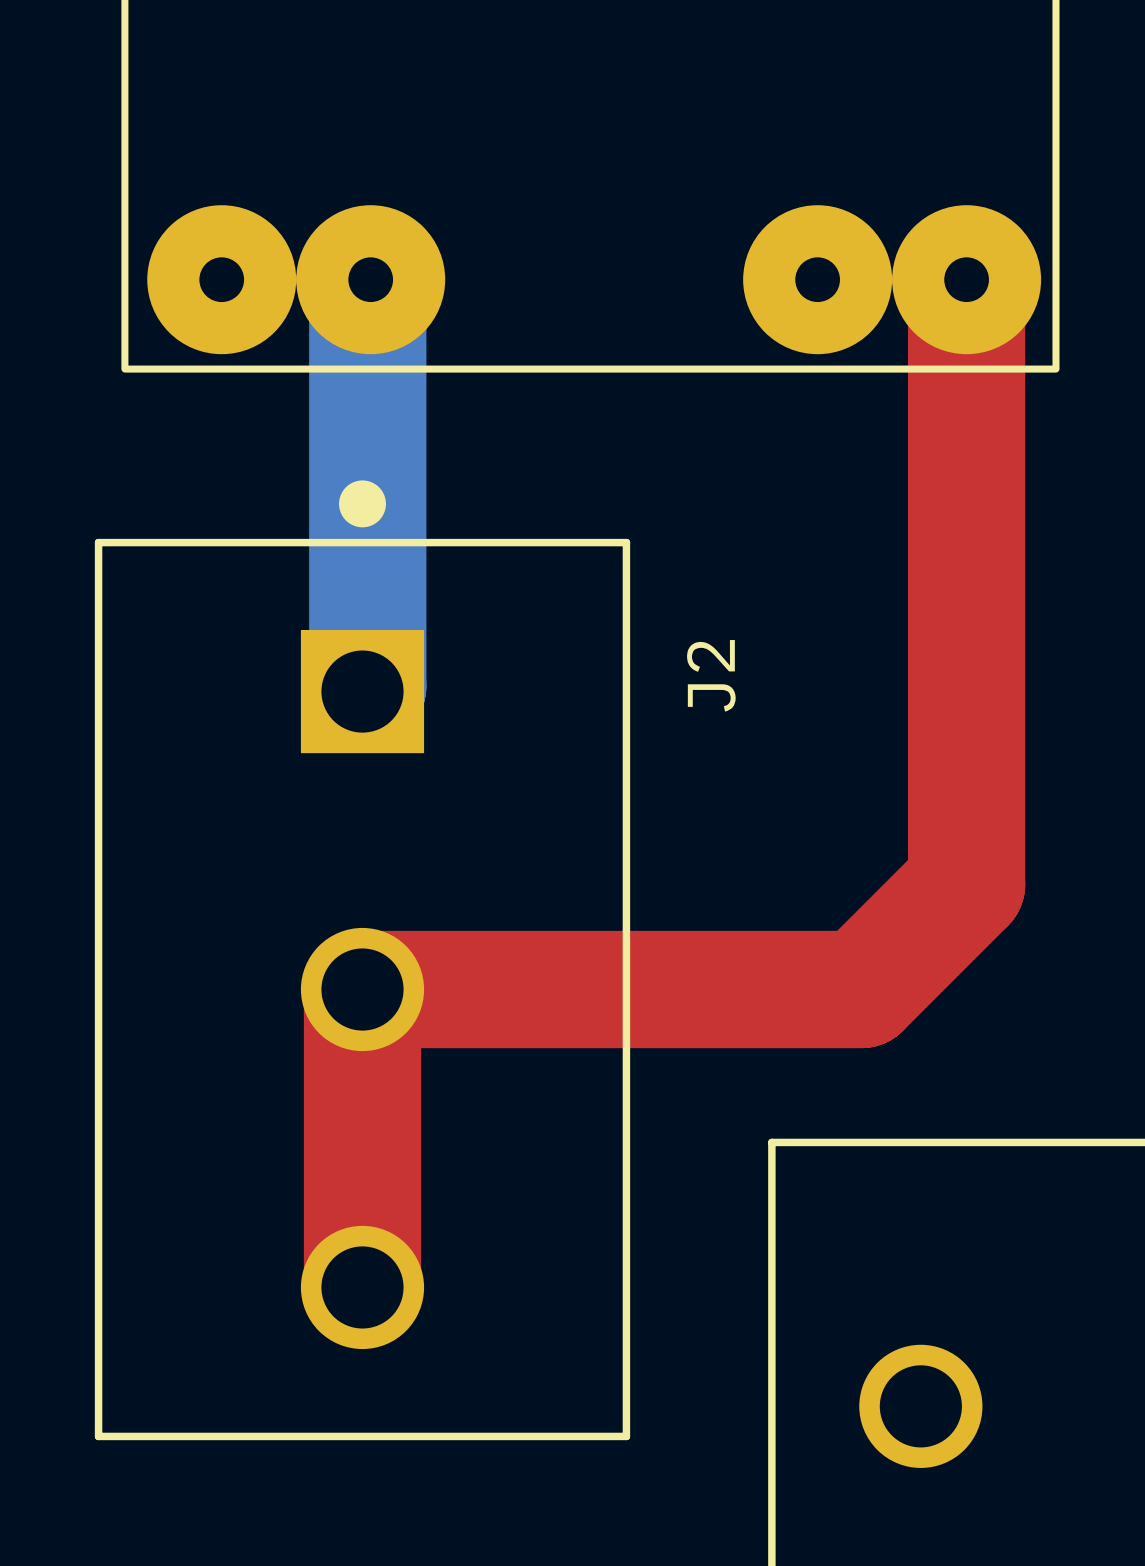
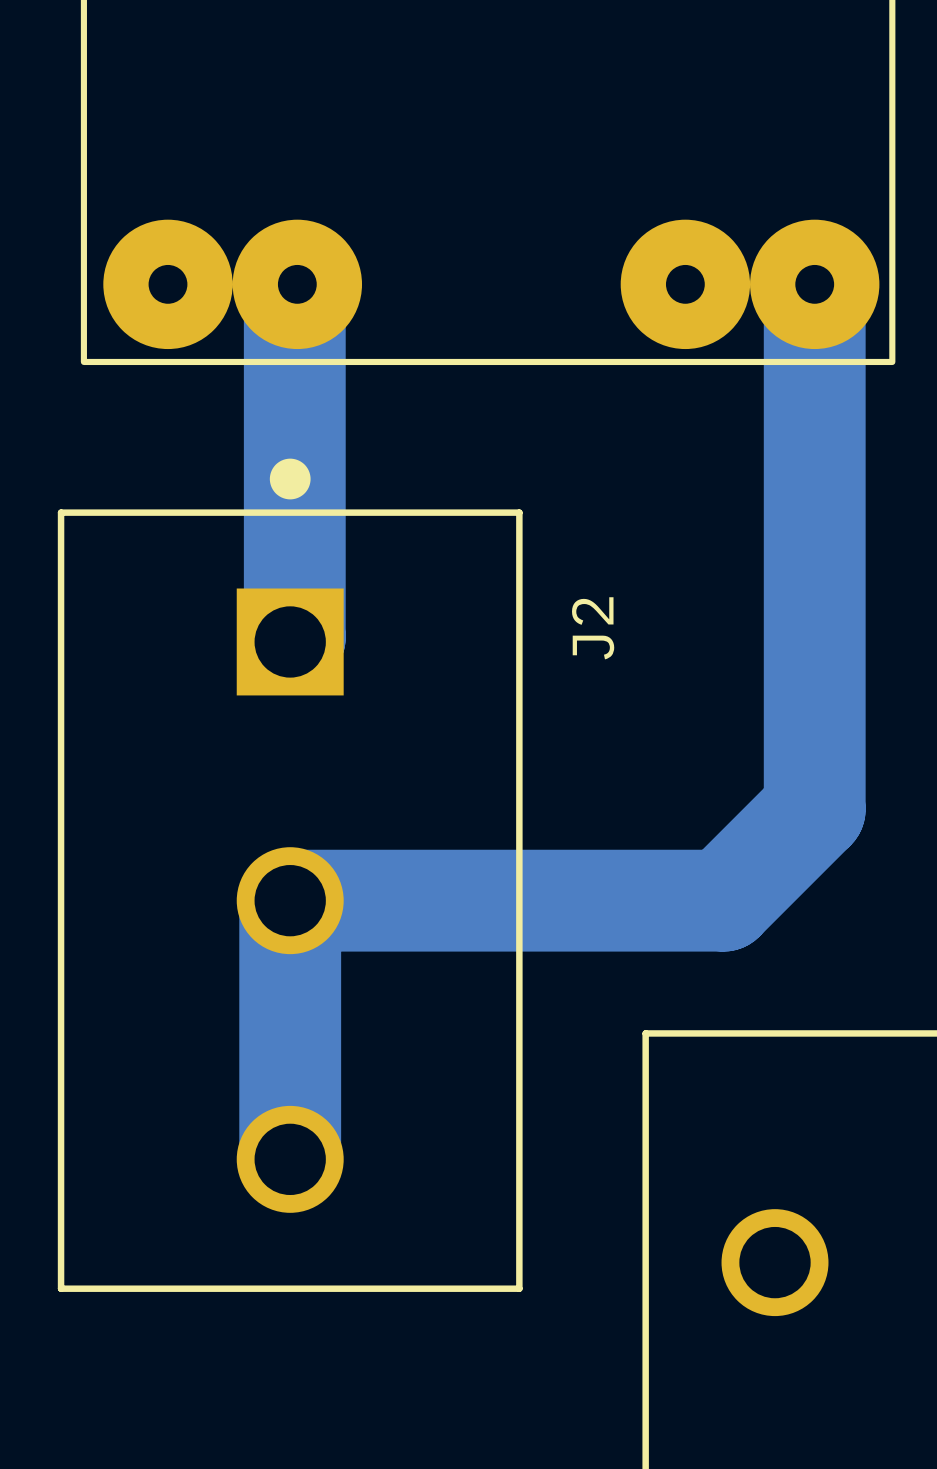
top track: (966, 282) (966, 884) (861, 989) (362, 989) (362, 1287) -> none
bottom track: none -> (814, 286) (814, 809) (723, 900) (290, 900) (290, 1159)

